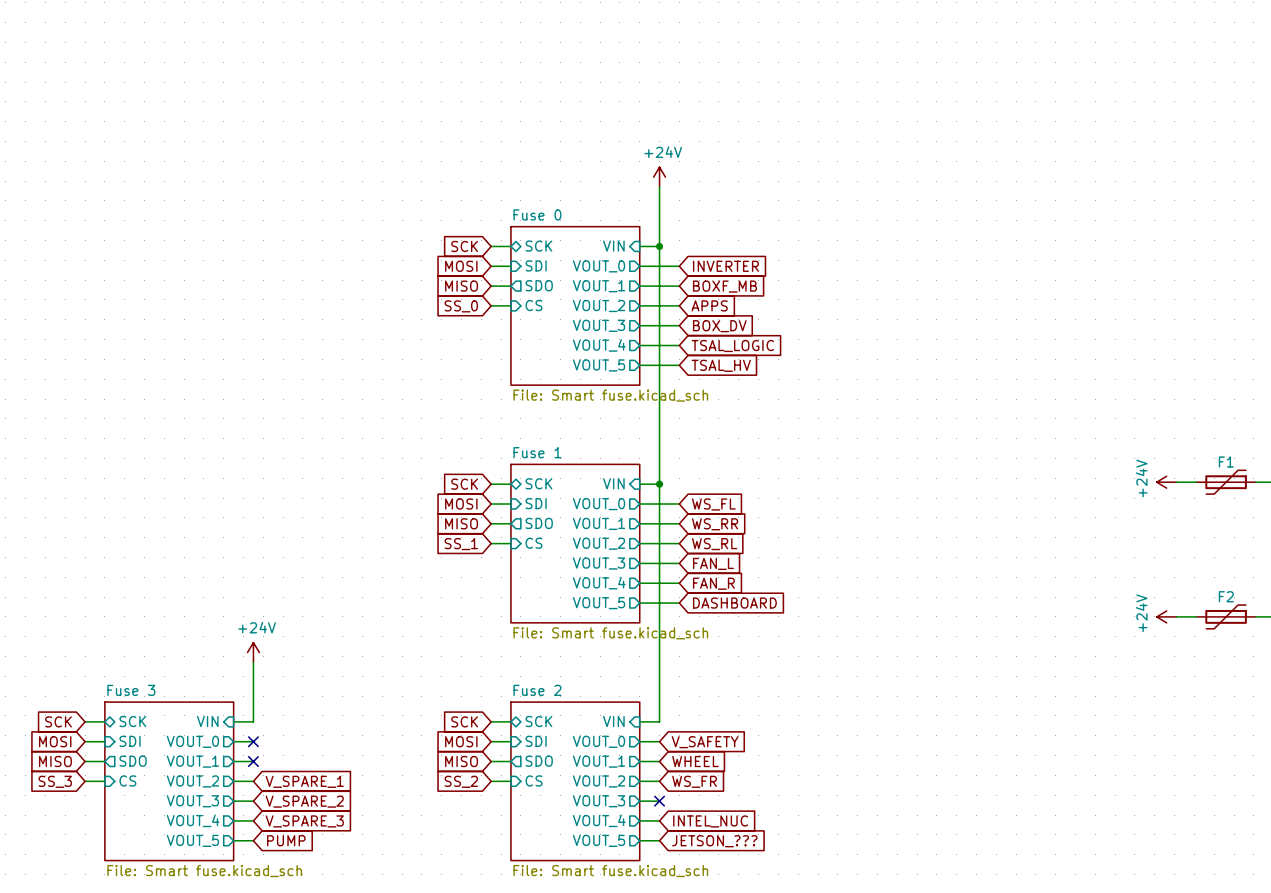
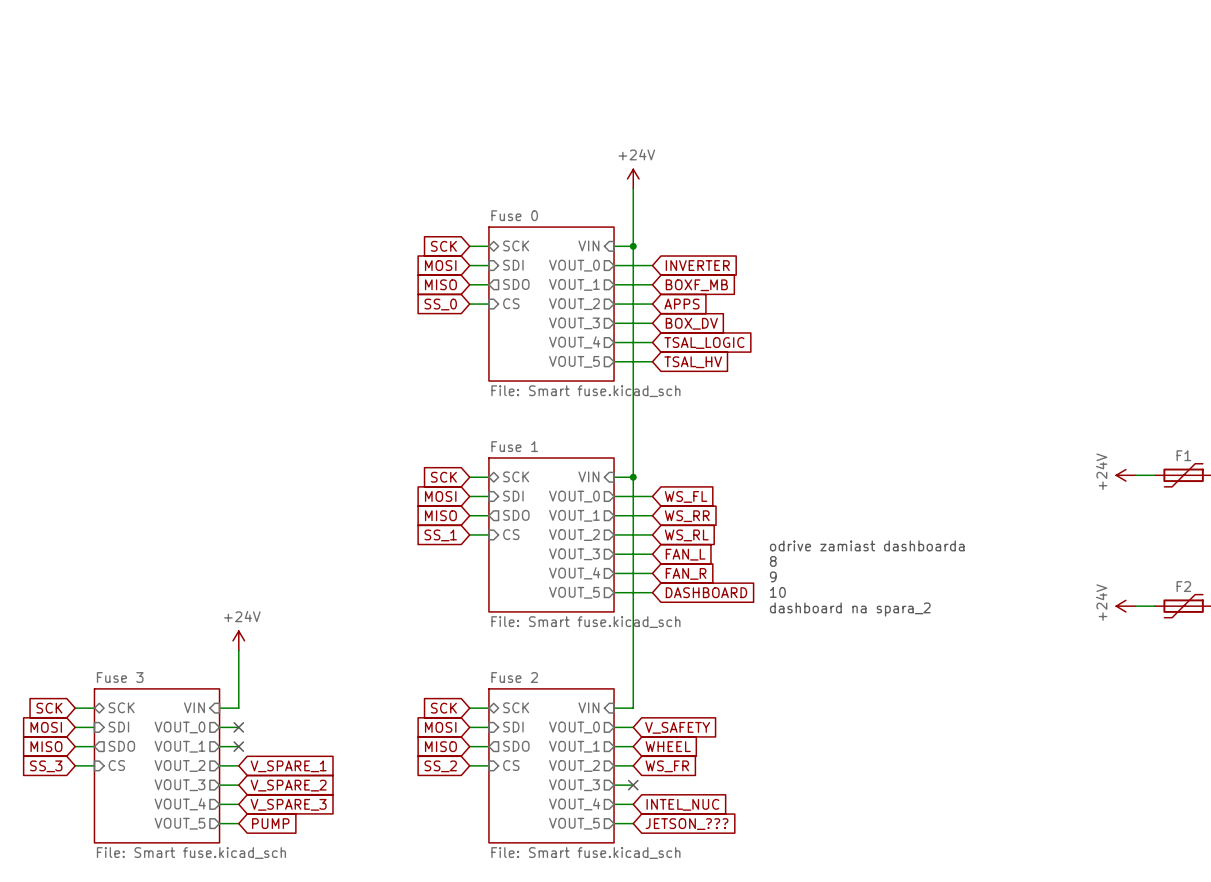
text: none -> odrive zamiast dashboarda (867, 545)
text: none -> 8 (773, 561)
text: none -> 9 (773, 576)
text: none -> 10 (777, 592)
text: none -> dashboard na spara_2 (850, 609)

